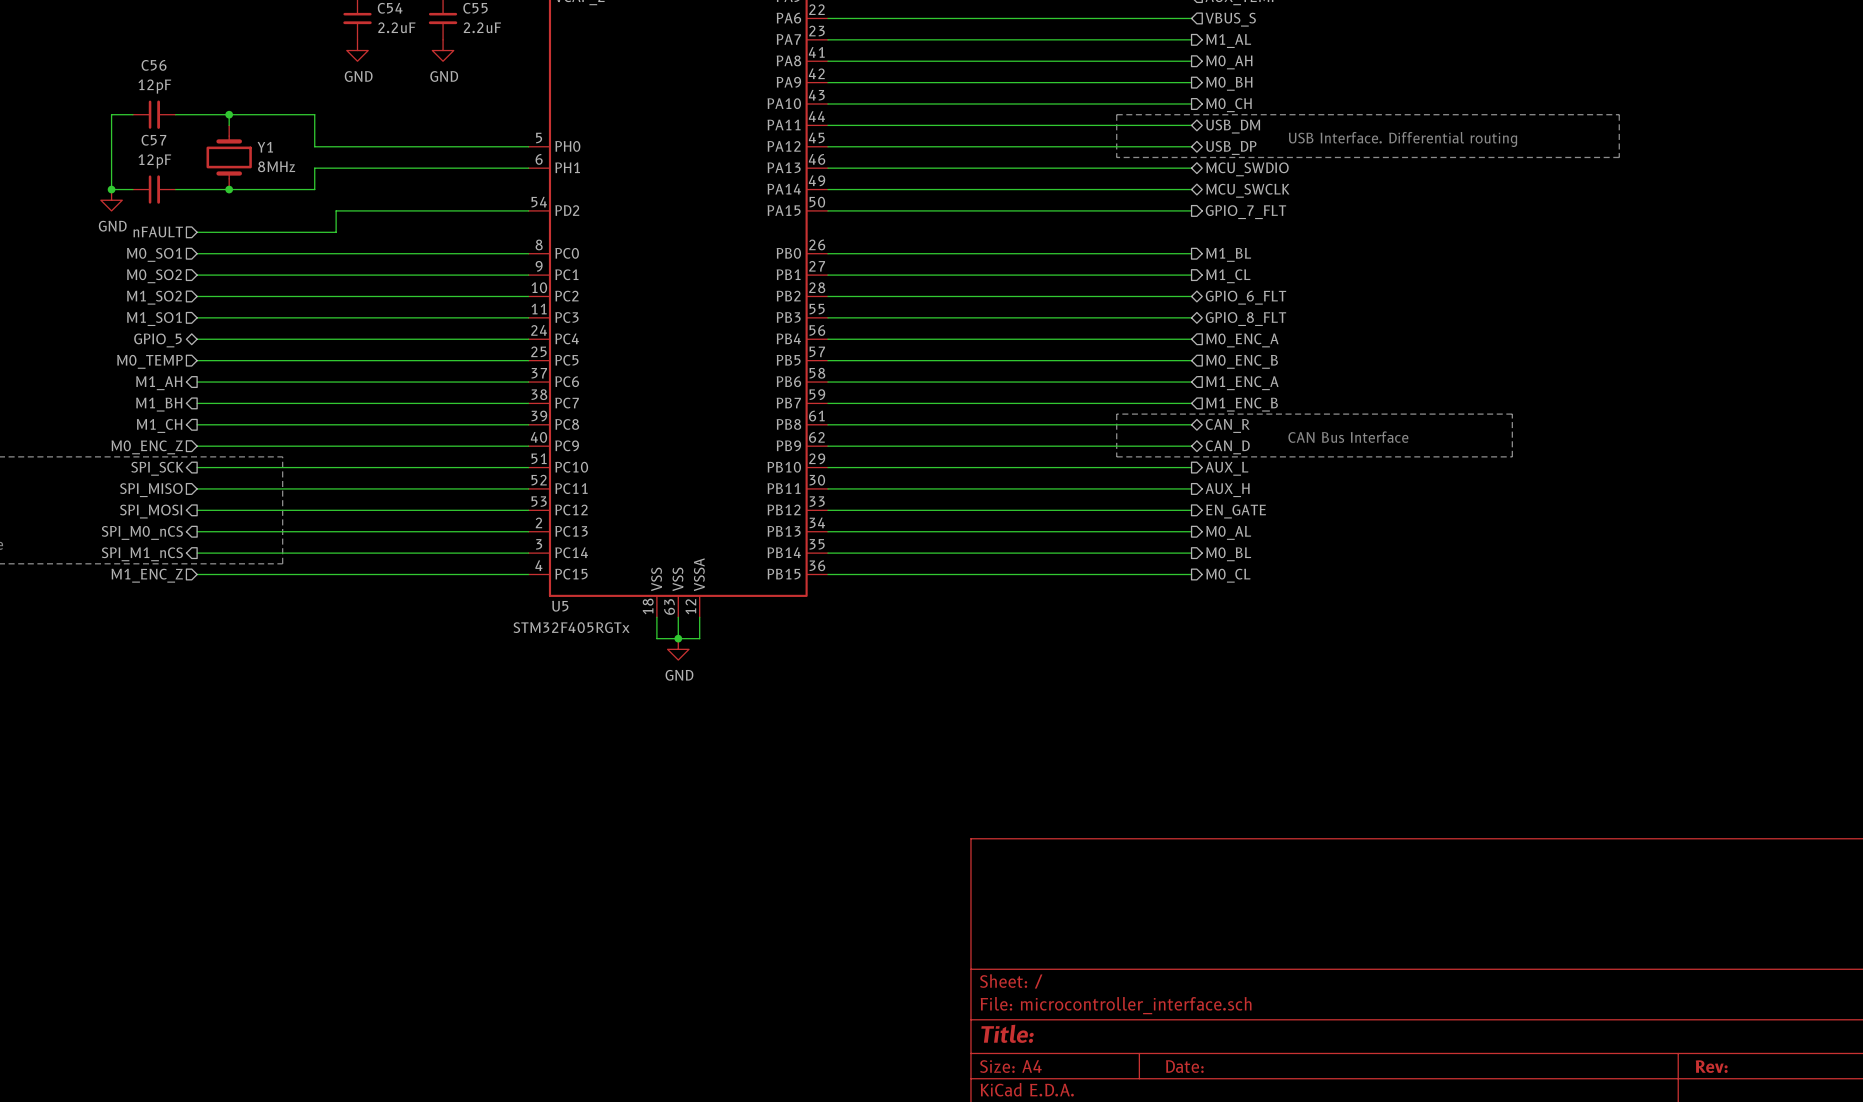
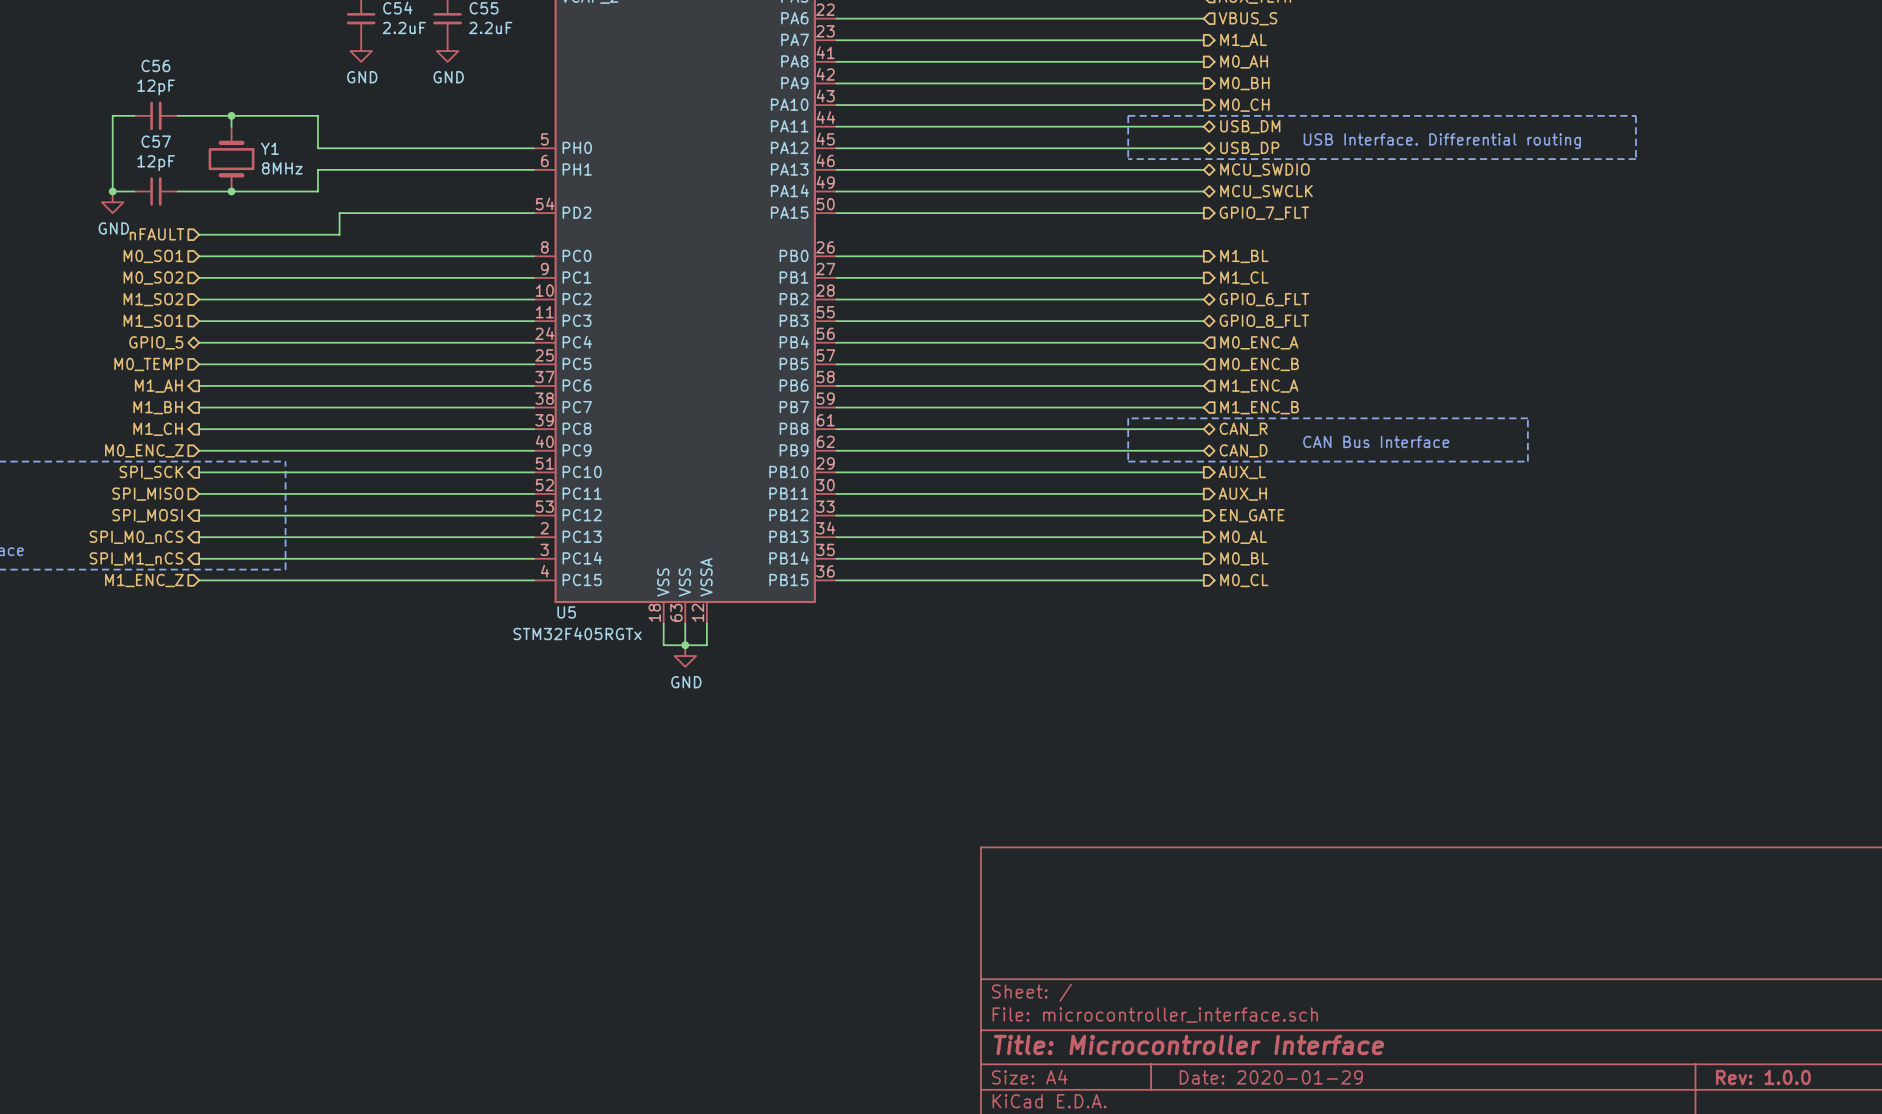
title block: Title: (1007, 1033) -> Title: Microcontroller Interface (1188, 1044)
title block: Date: (1184, 1066) -> Date: 2020-01-29 (1271, 1077)
title block: Rev: (1711, 1066) -> Rev: 1.0.0 (1763, 1077)

